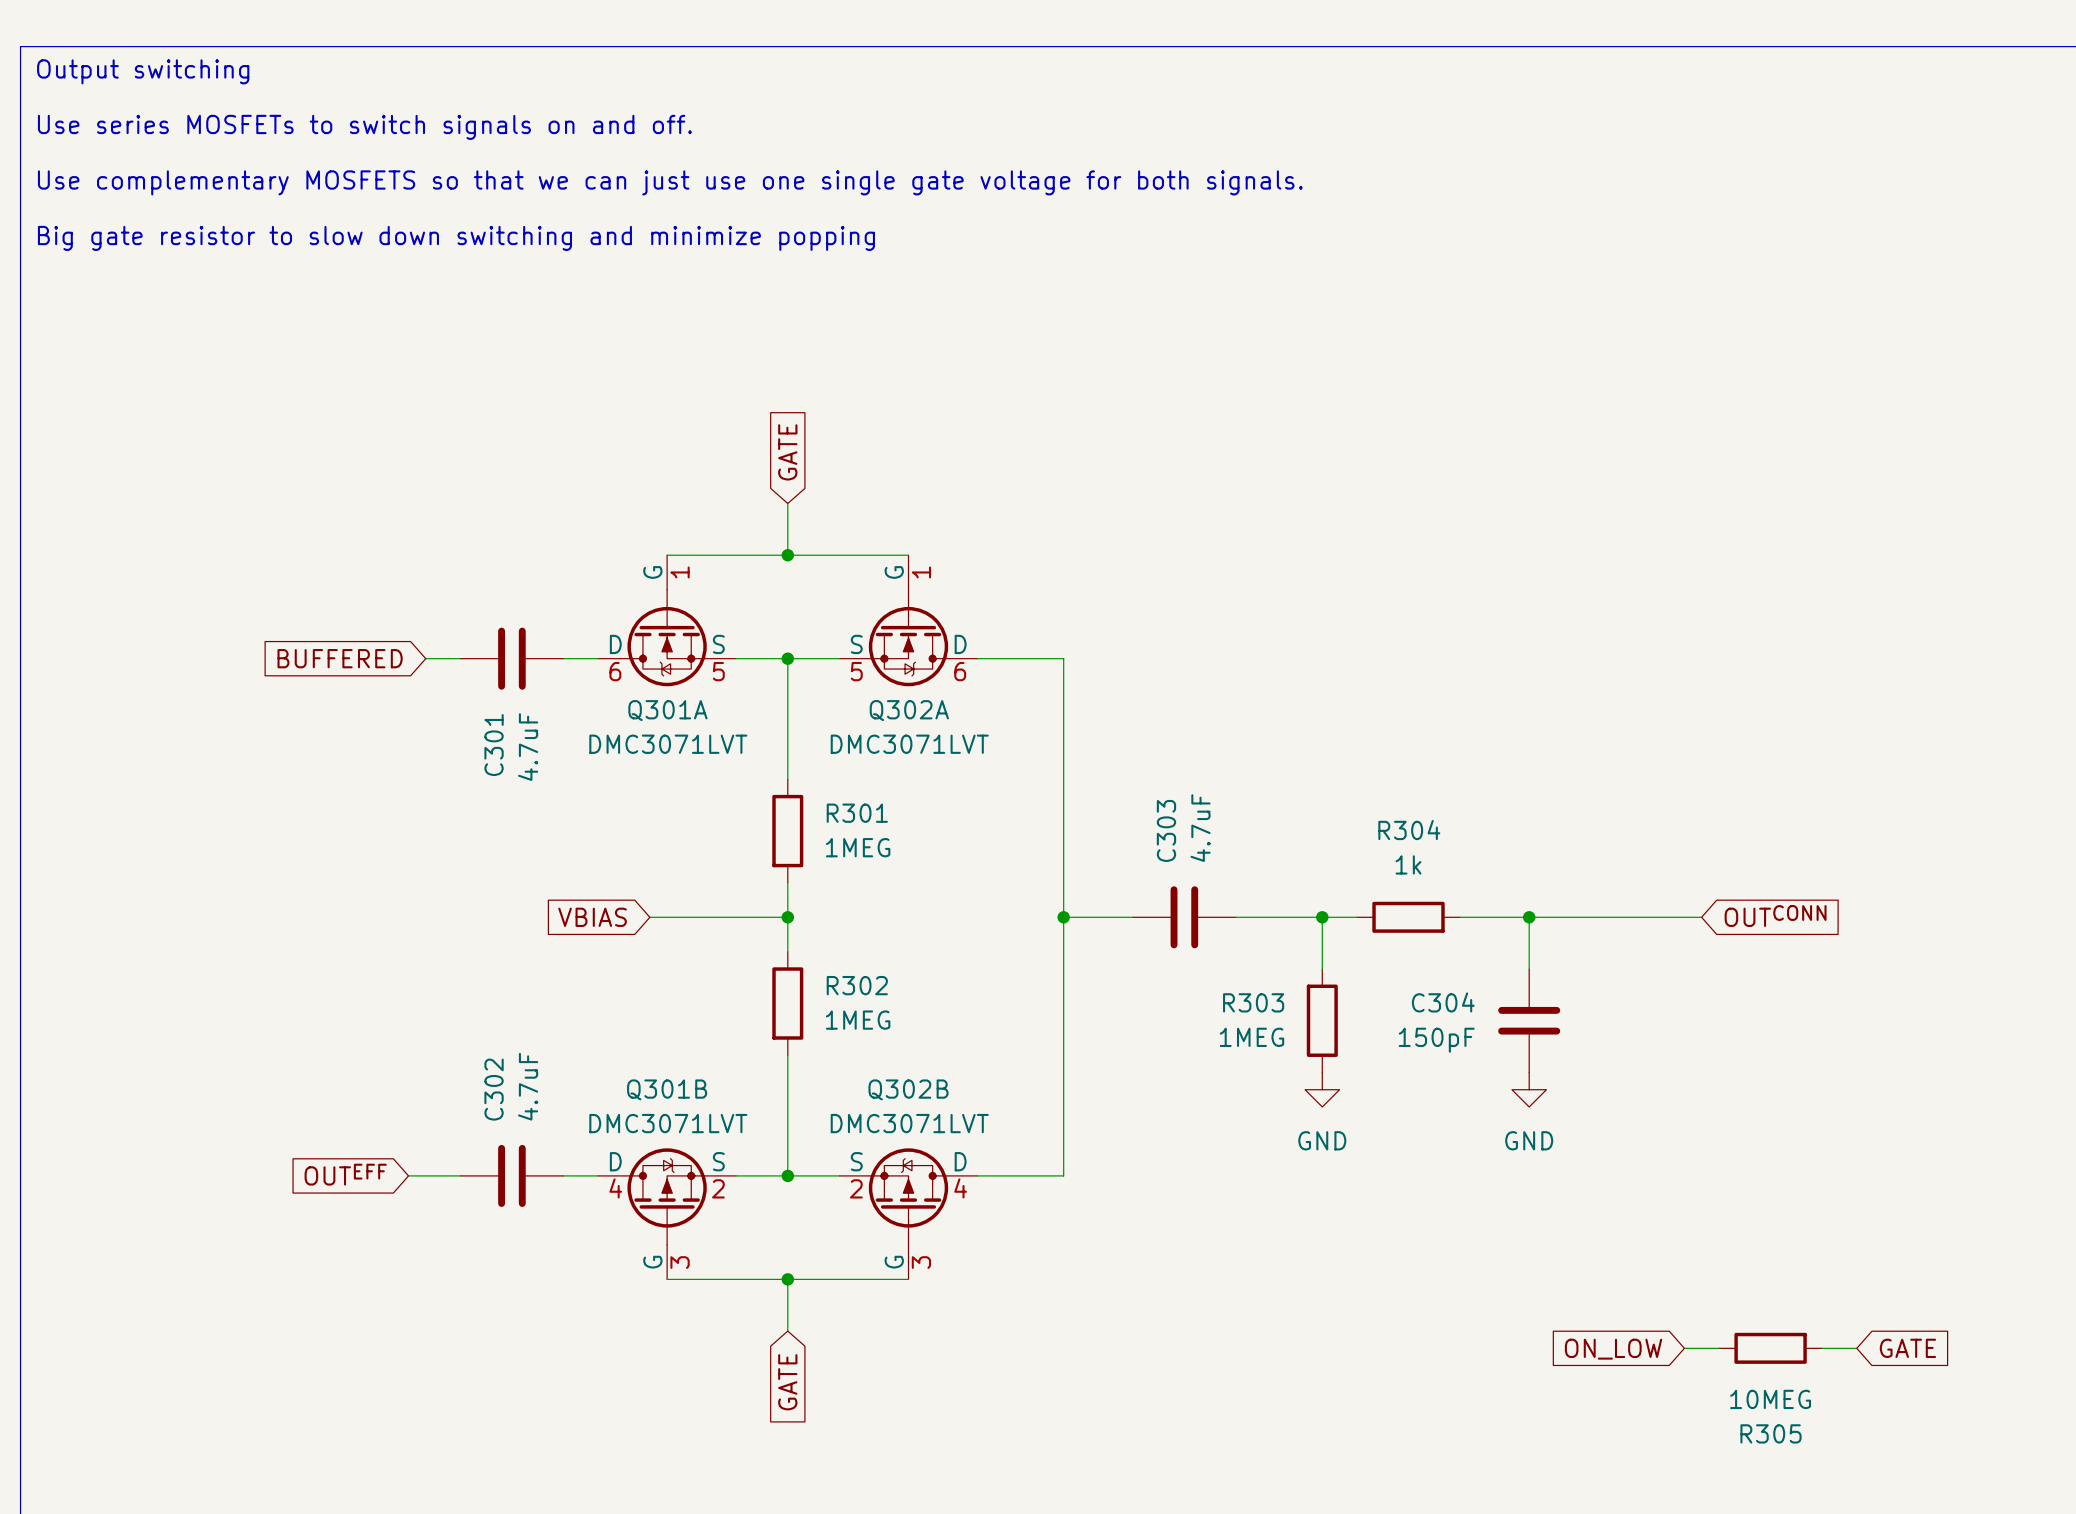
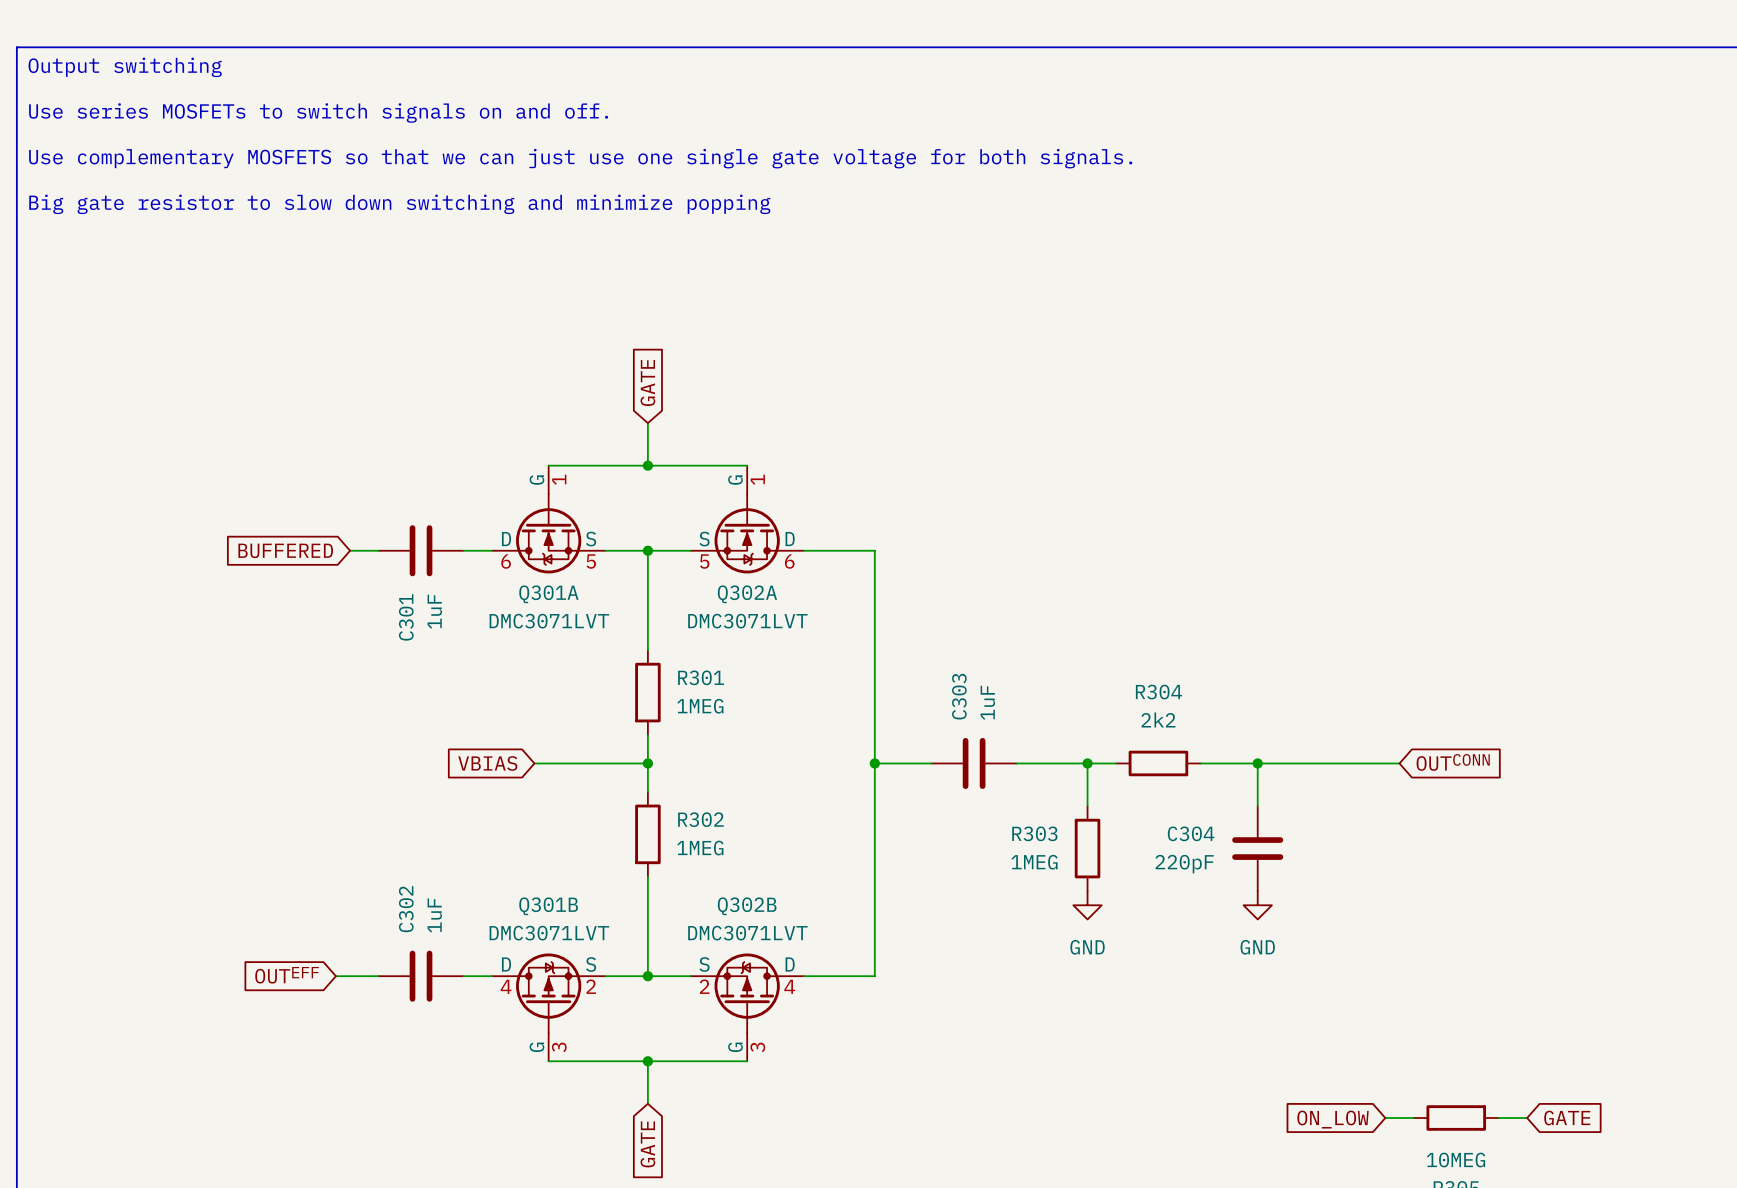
C301 value: 4.7uF (528, 747) -> 1uF (434, 611)
C303 value: 4.7uF (1200, 828) -> 1uF (987, 702)
R304 value: 1k (1408, 864) -> 2k2 (1158, 719)
C304 value: 150pF (1436, 1040) -> 220pF (1184, 864)
C302 value: 4.7uF (528, 1086) -> 1uF (434, 915)

